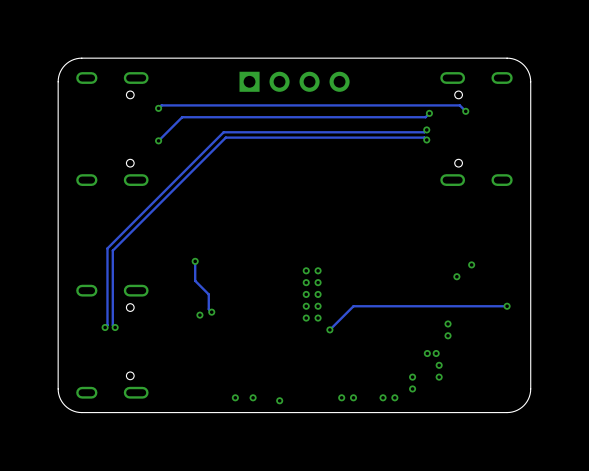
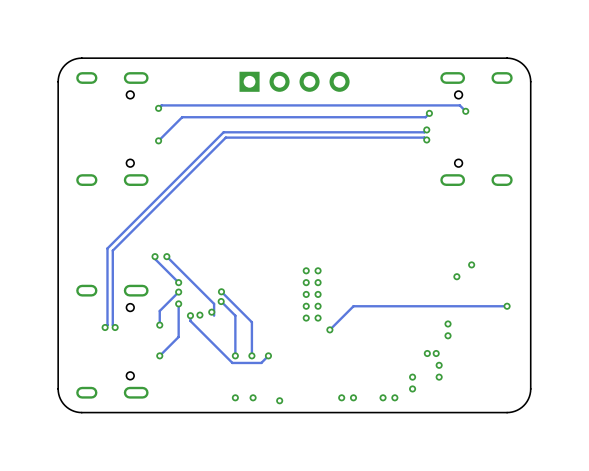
track: none -> (155, 256) (155, 258) (178, 282)
via: none -> (155, 256)
track: none -> (166, 256) (214, 303) (214, 315)
via: none -> (166, 256)
track: (195, 261) (195, 280) (208, 294) (208, 309) (211, 312) -> none
via: (195, 261) -> none
via: none -> (178, 282)
track: none -> (221, 291) (251, 322) (251, 355)
via: none -> (221, 291)
track: none -> (178, 292) (159, 310) (159, 325)
via: none -> (178, 292)
track: none -> (221, 301) (235, 315) (235, 355)
via: none -> (221, 301)
track: none -> (178, 303) (178, 336) (159, 355)
via: none -> (178, 303)
track: none -> (190, 315) (190, 321) (232, 362) (261, 362) (268, 355)
via: none -> (190, 315)
via: none -> (159, 325)
via: none -> (159, 355)
via: none -> (235, 355)
via: none -> (251, 355)
via: none -> (268, 355)

